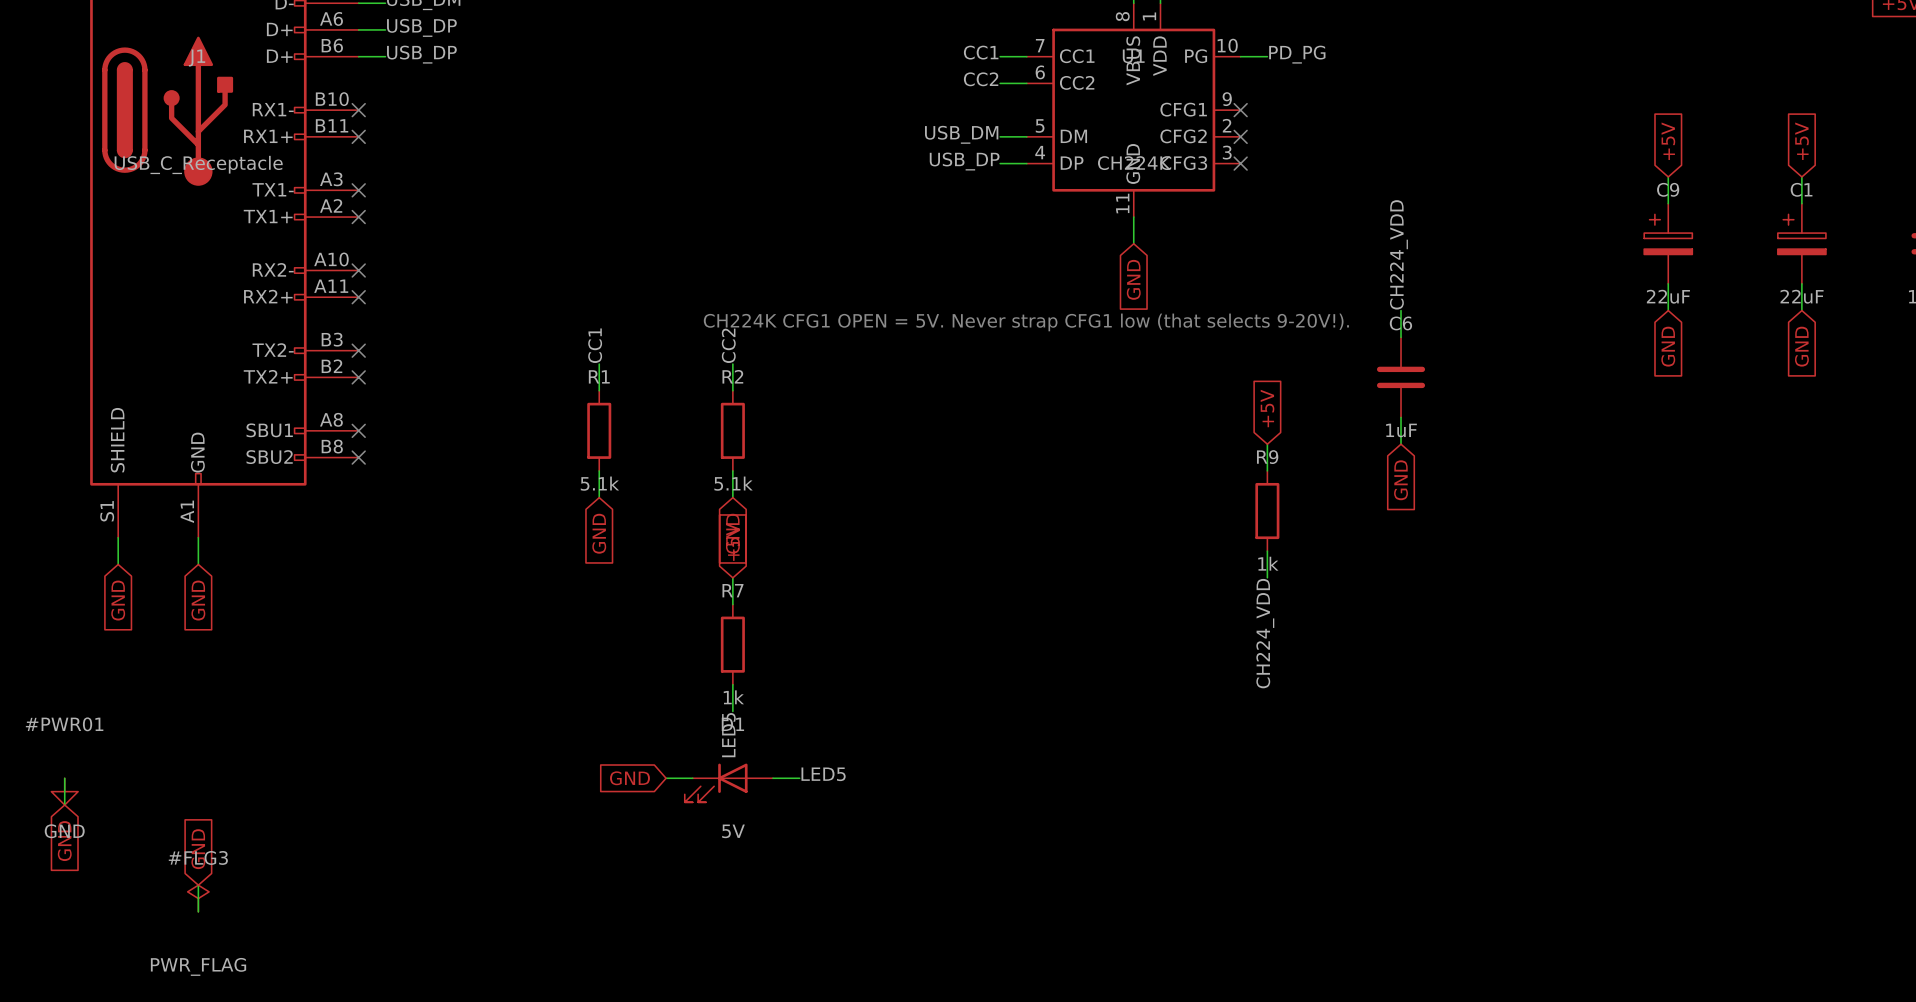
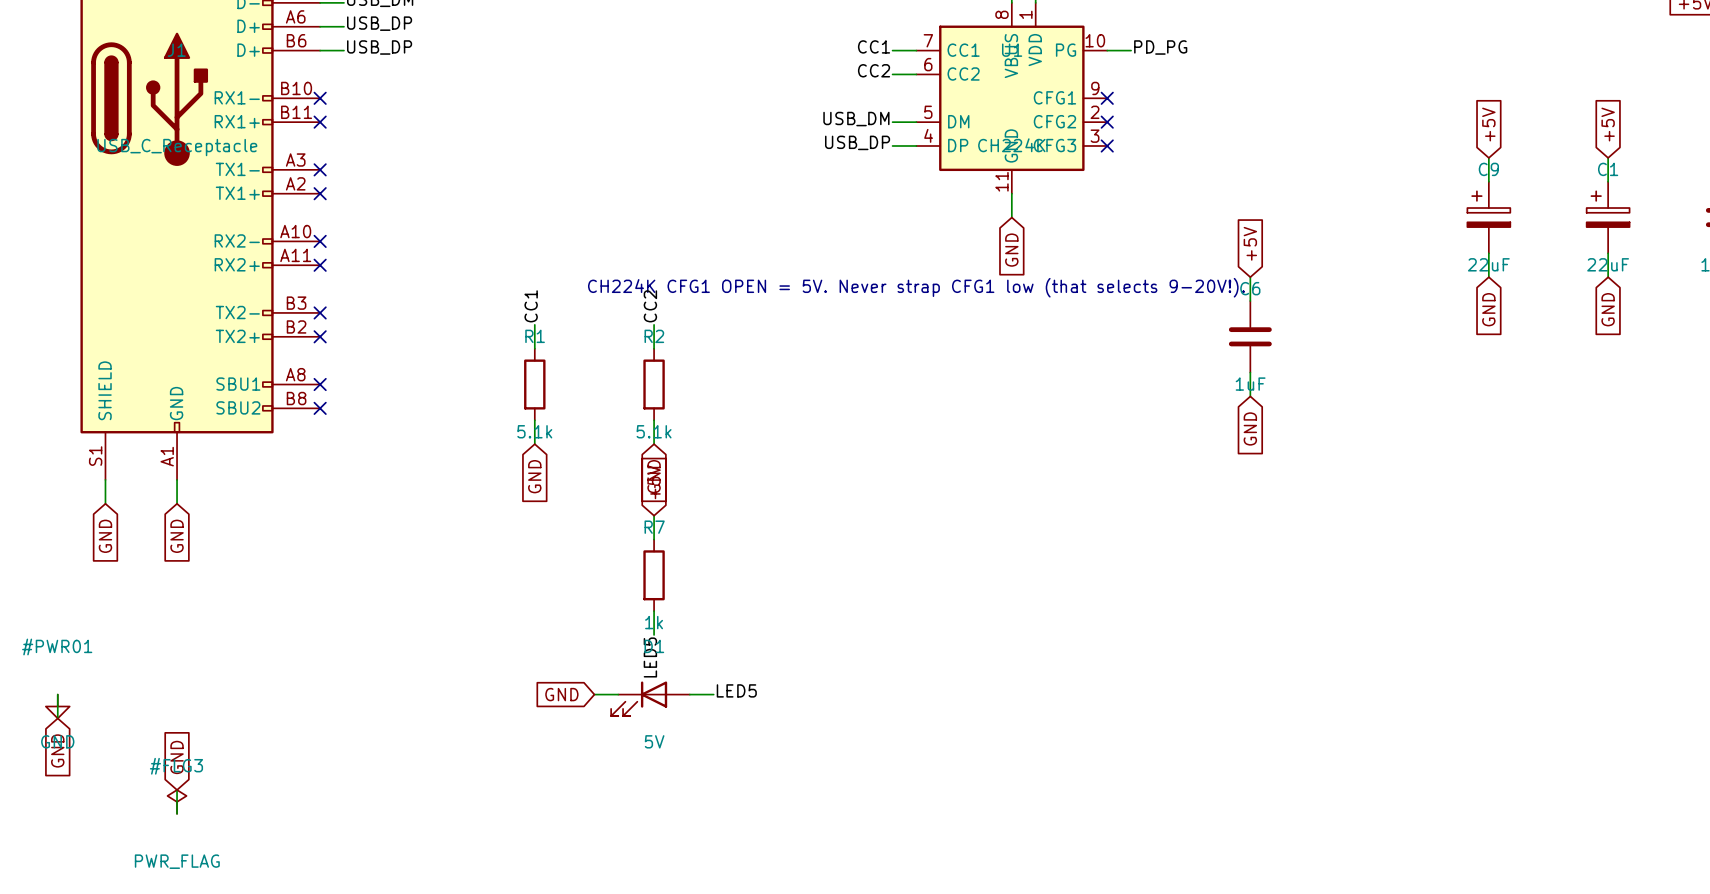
label: CH224_VDD (1398, 254) -> none
global label position: +5V (1267, 408) -> +5V (1250, 243)
wire: (1267, 444) (1267, 470) -> none
R9: 1k (1267, 511) -> none
wire: (1267, 551) (1267, 577) -> none
label: CH224_VDD (1265, 633) -> none

